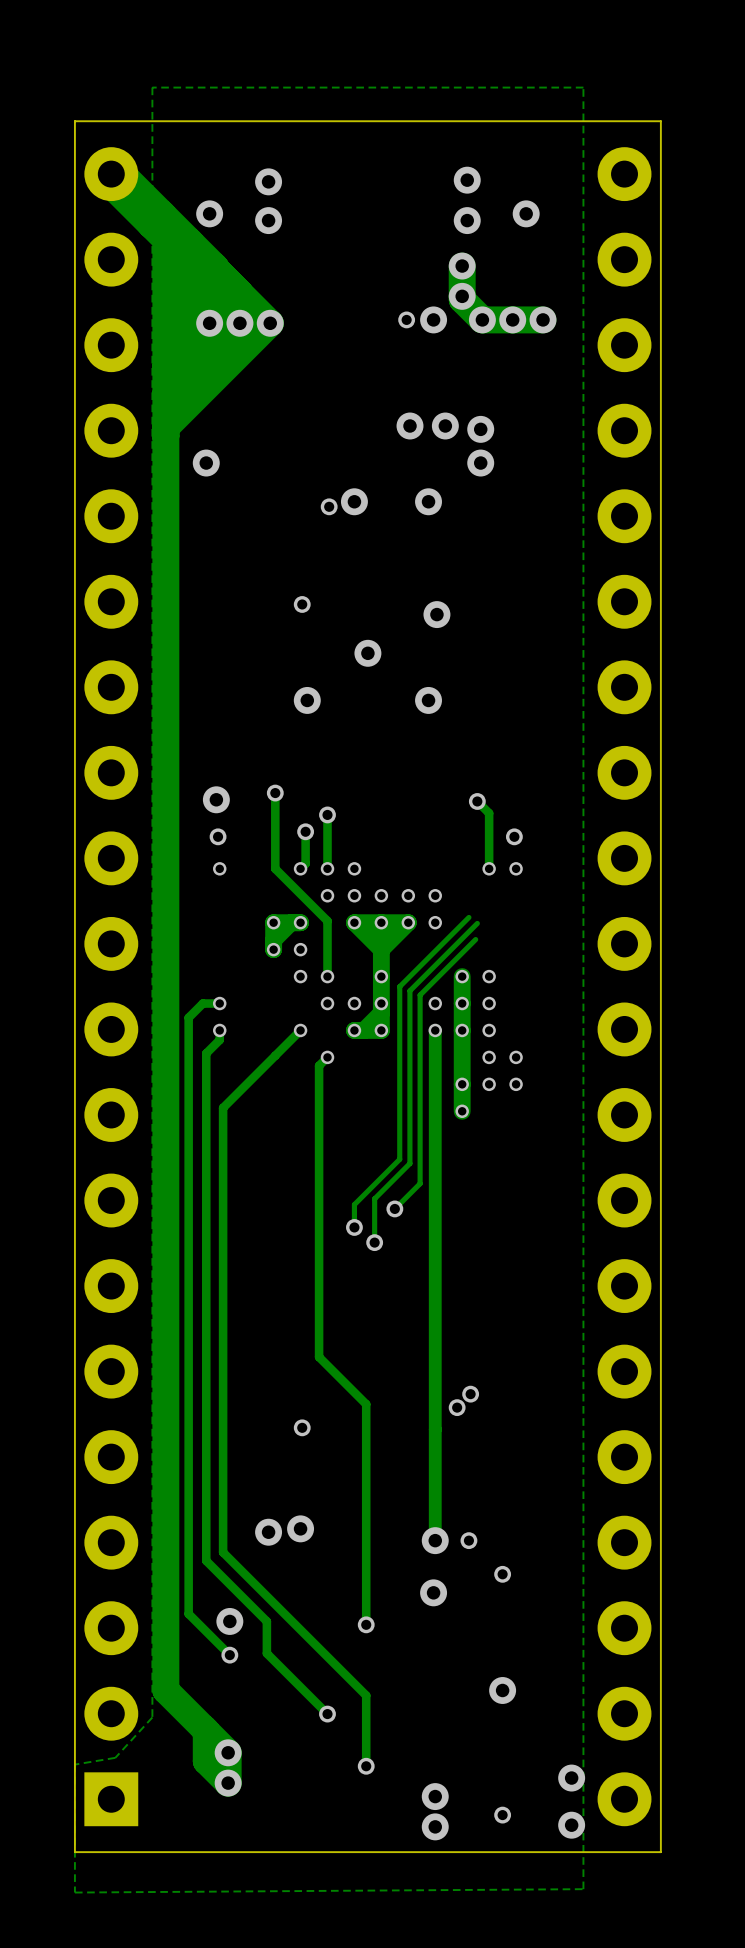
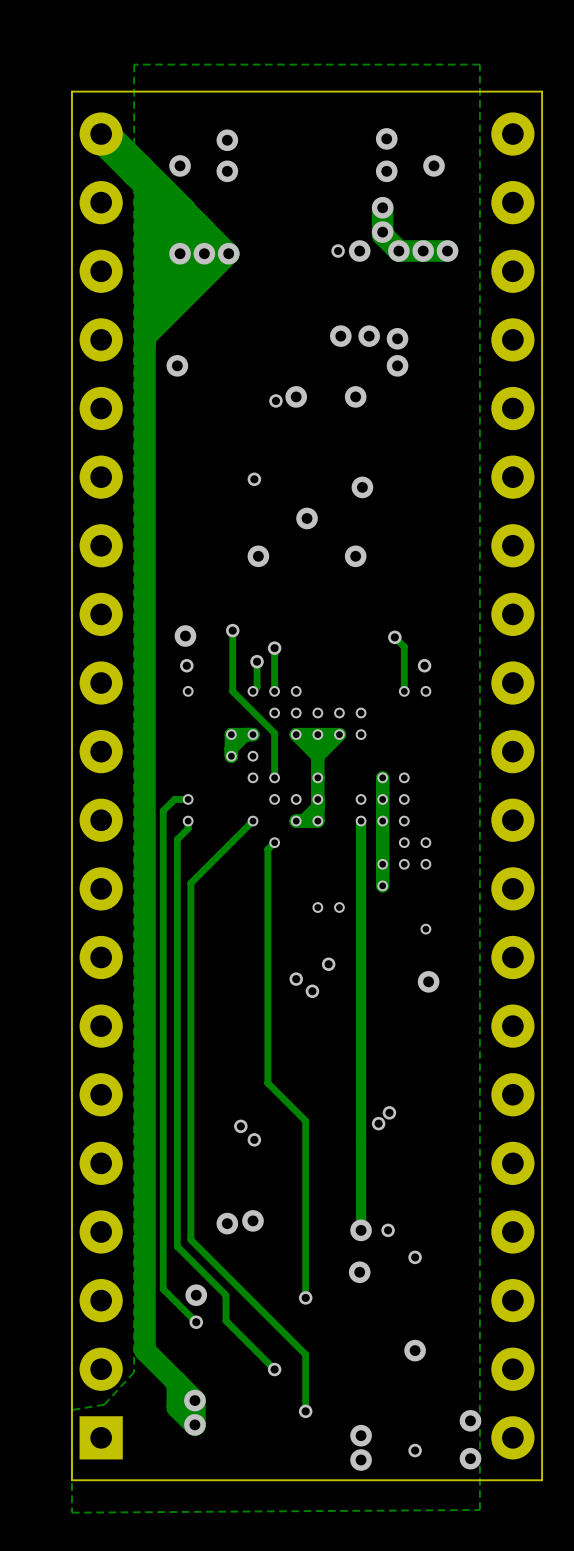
track: (468, 917) (399, 986) (399, 1159) (354, 1204) (354, 1227) -> none
track: (477, 923) (409, 990) (409, 1163) (374, 1198) (374, 1242) -> none
track: (475, 939) (420, 995) (420, 1183) (394, 1208) -> none
via: none -> (317, 907)
via: none -> (339, 907)
via: none -> (425, 929)
via: none -> (428, 981)
via: none -> (240, 1126)

